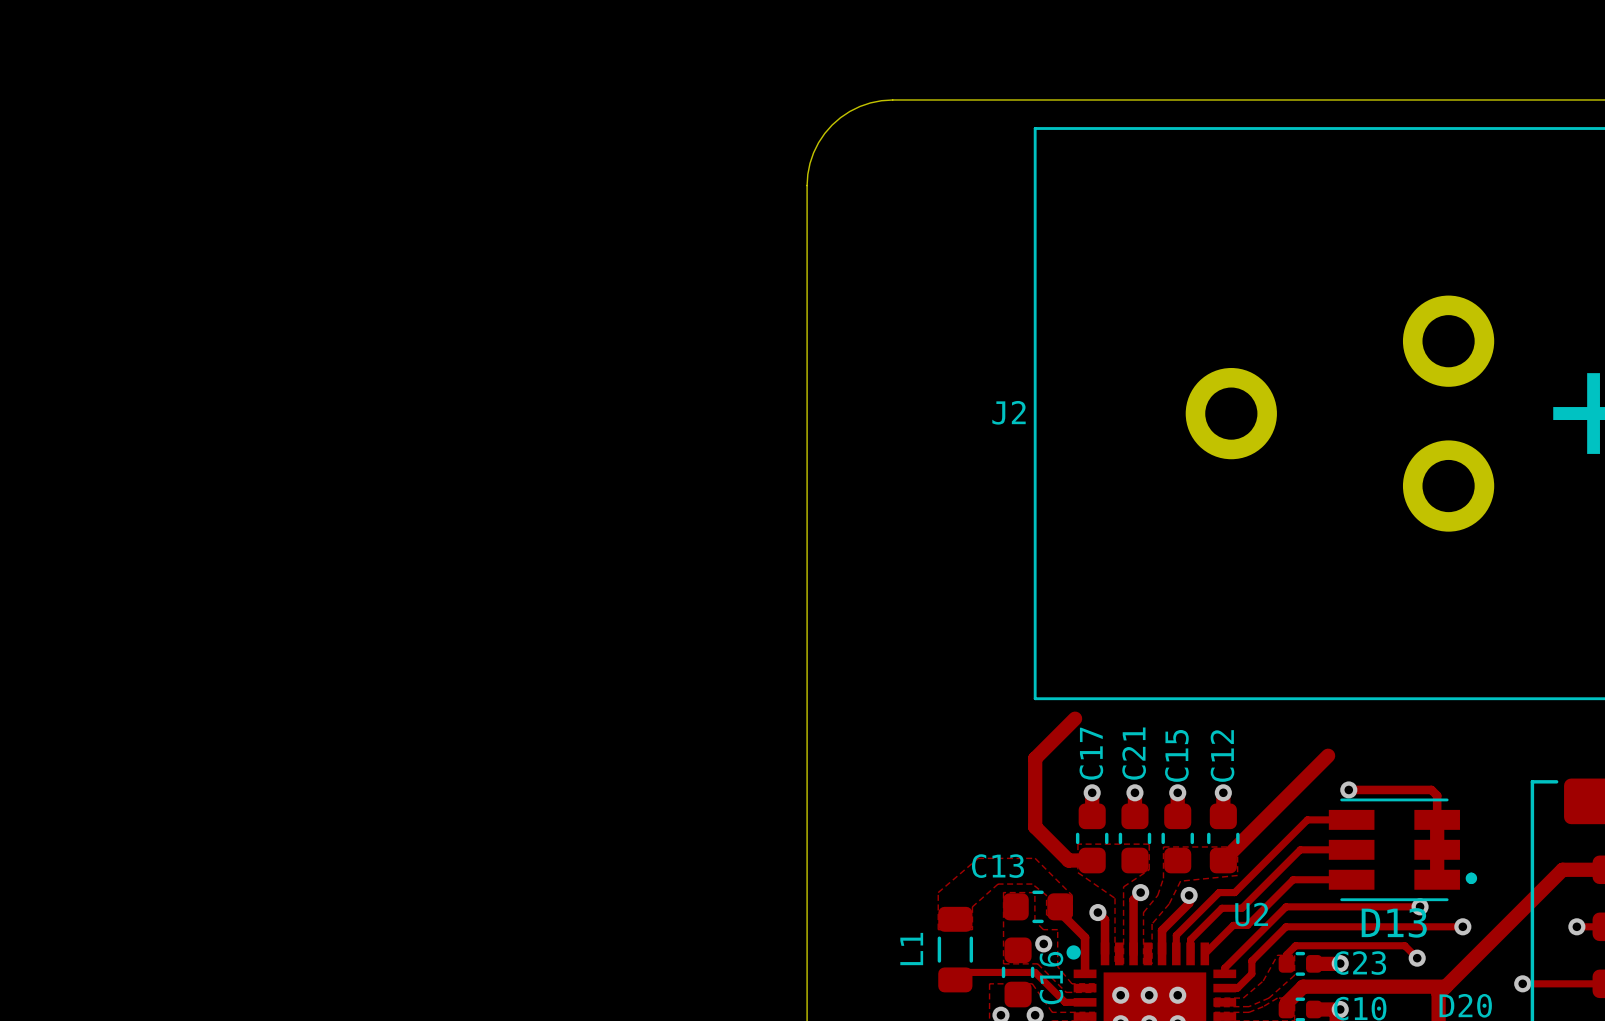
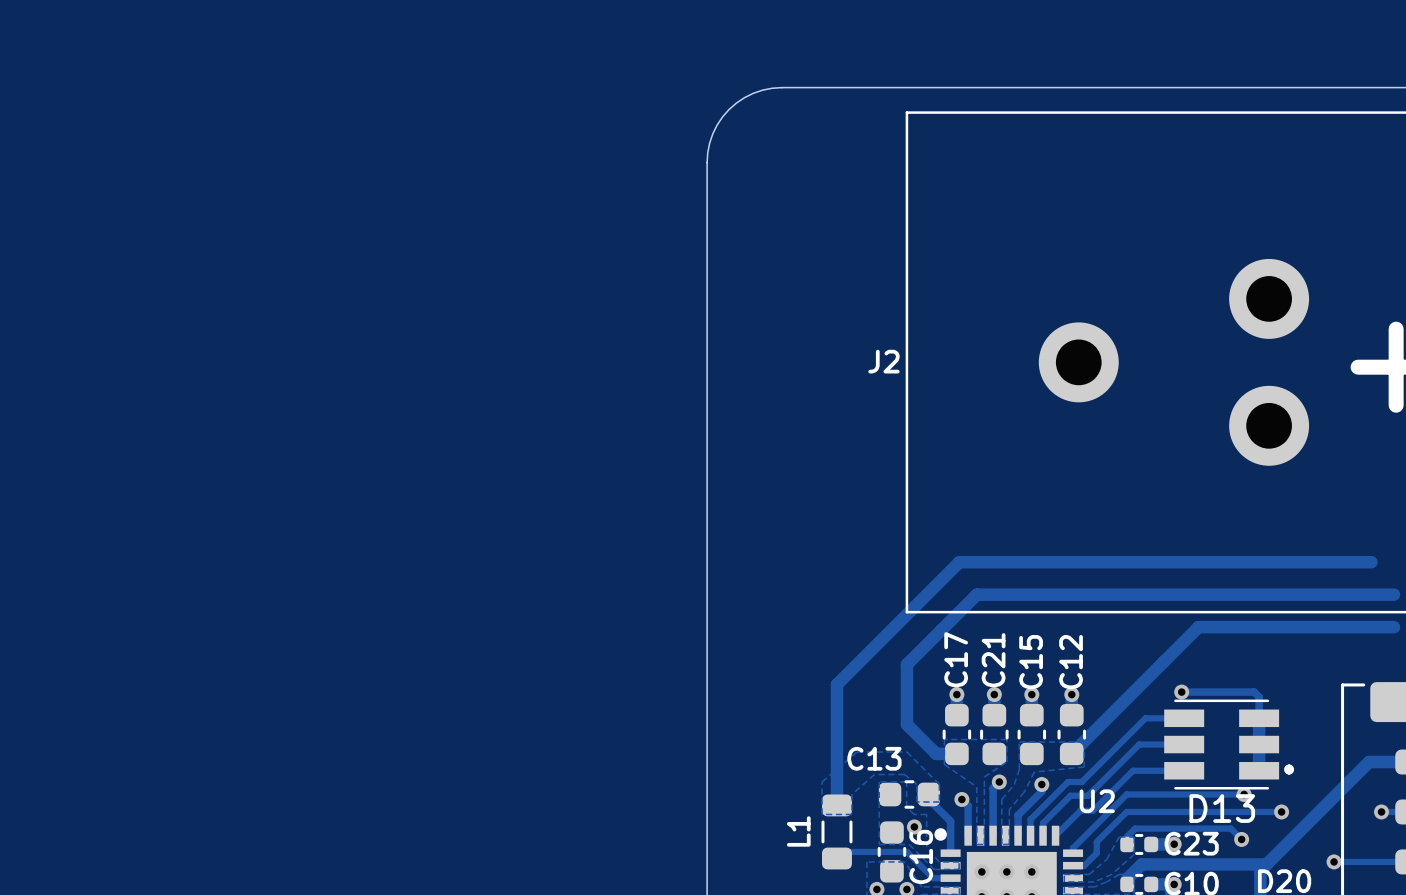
track: none -> (1371, 562) (959, 562) (836, 684) (836, 805)
track: none -> (1394, 594) (976, 594) (941, 629)
track: none -> (1394, 627) (1198, 627) (1163, 662)

